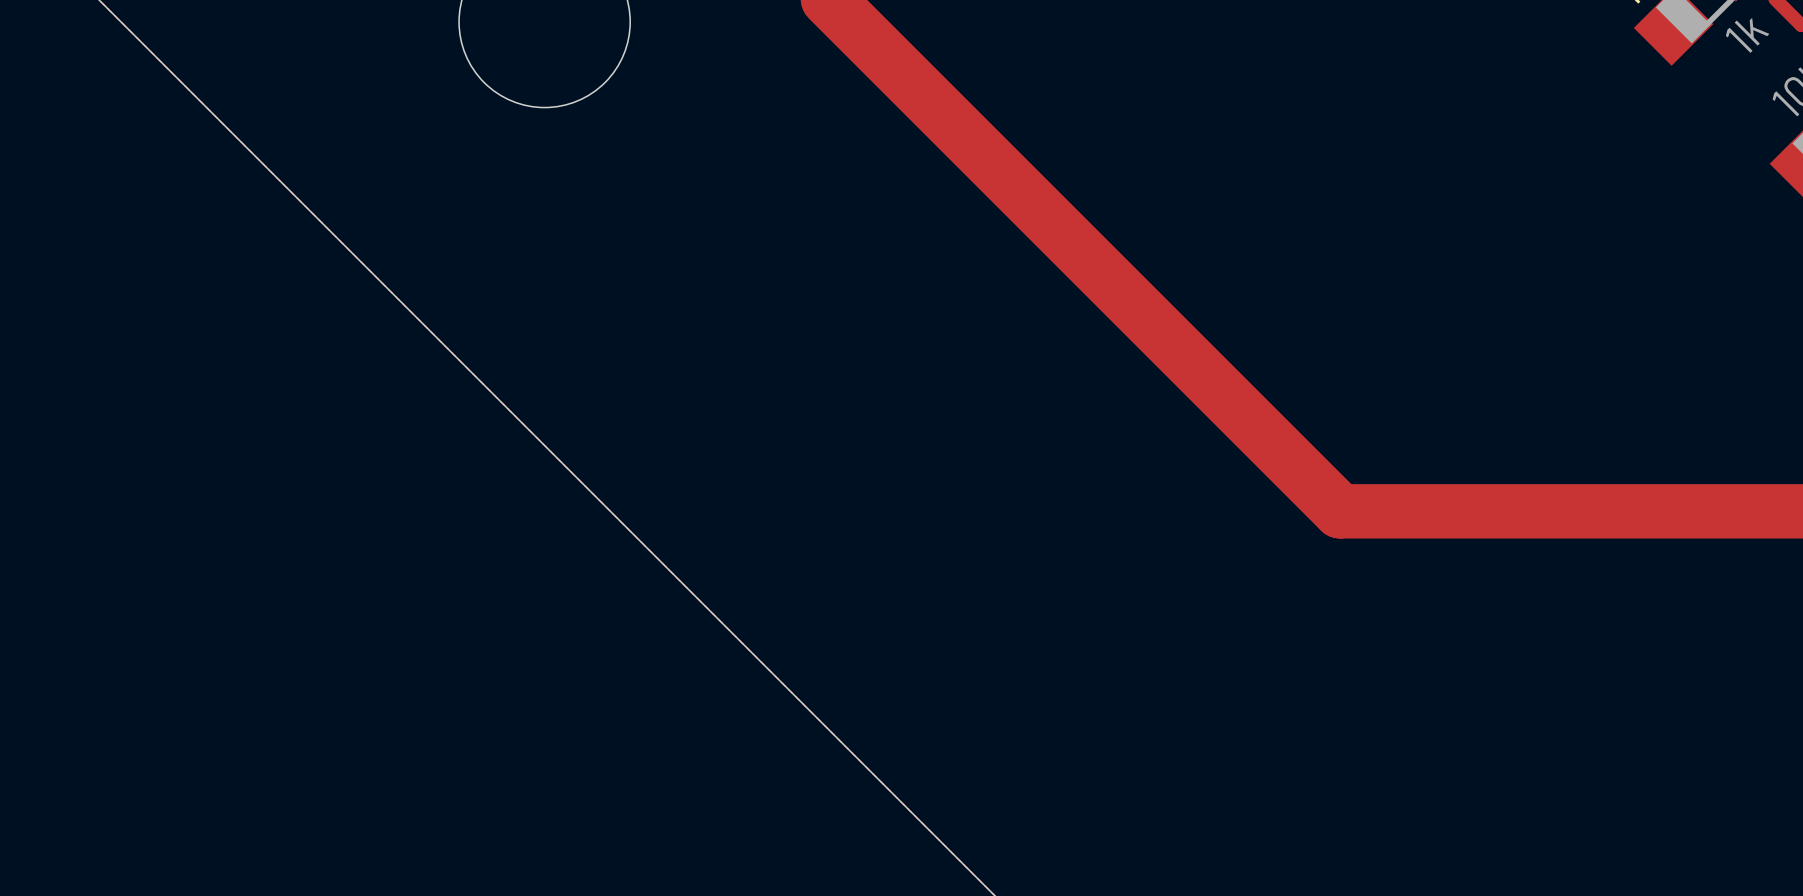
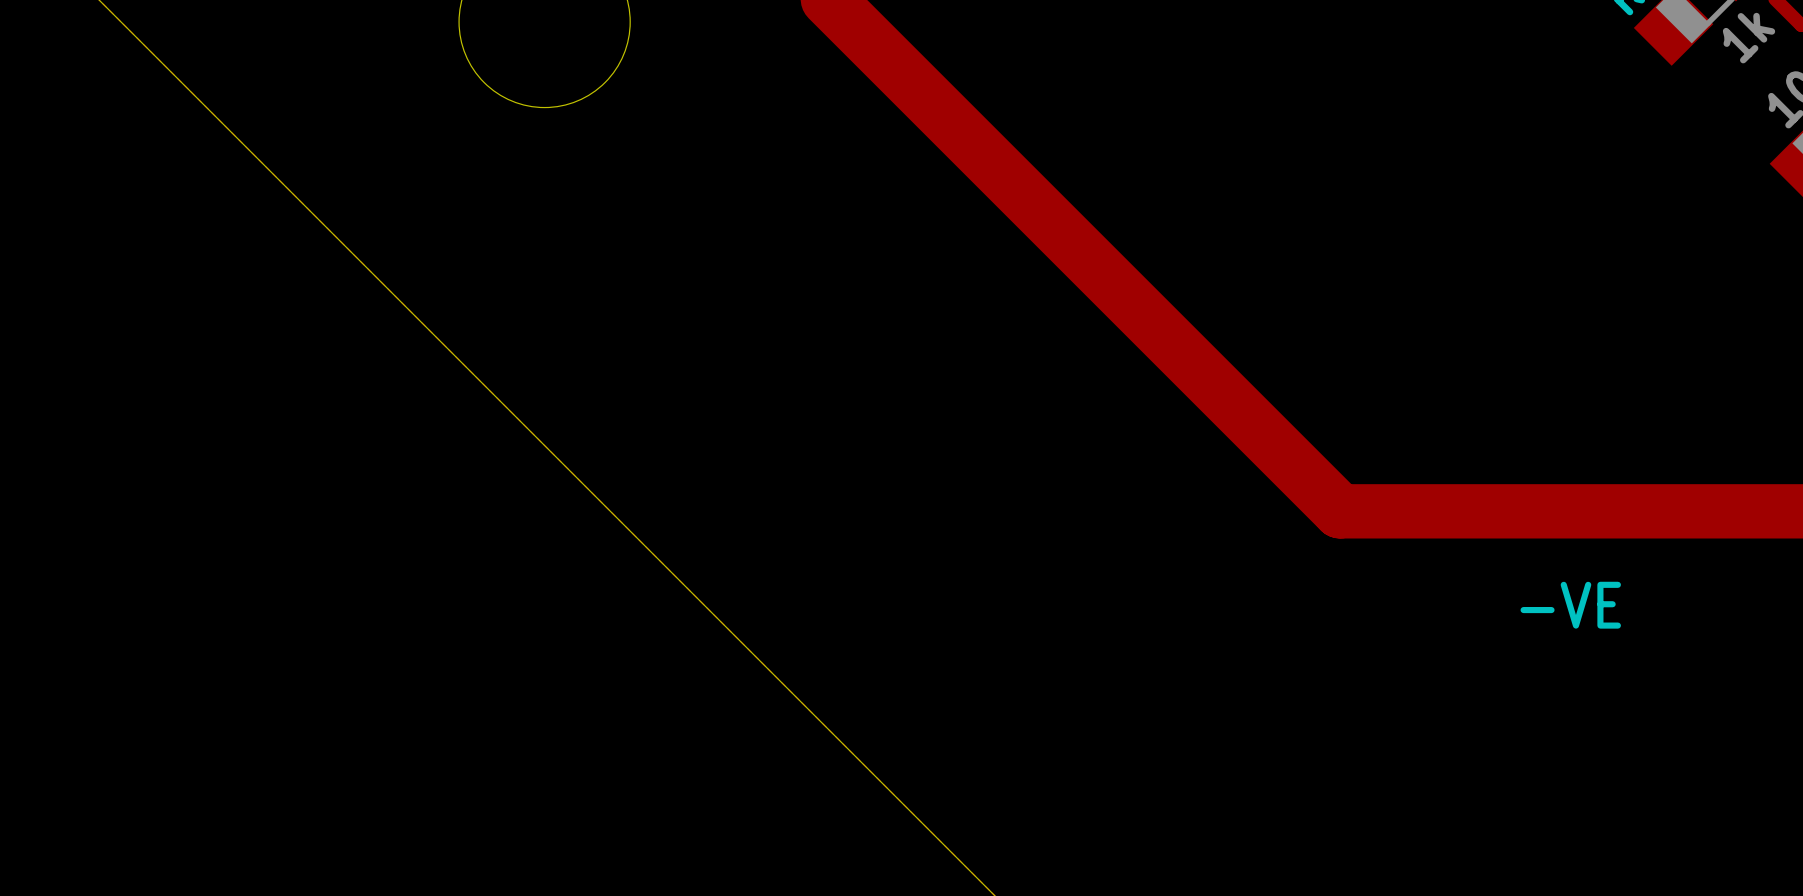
text: none -> -VE (1570, 605)

